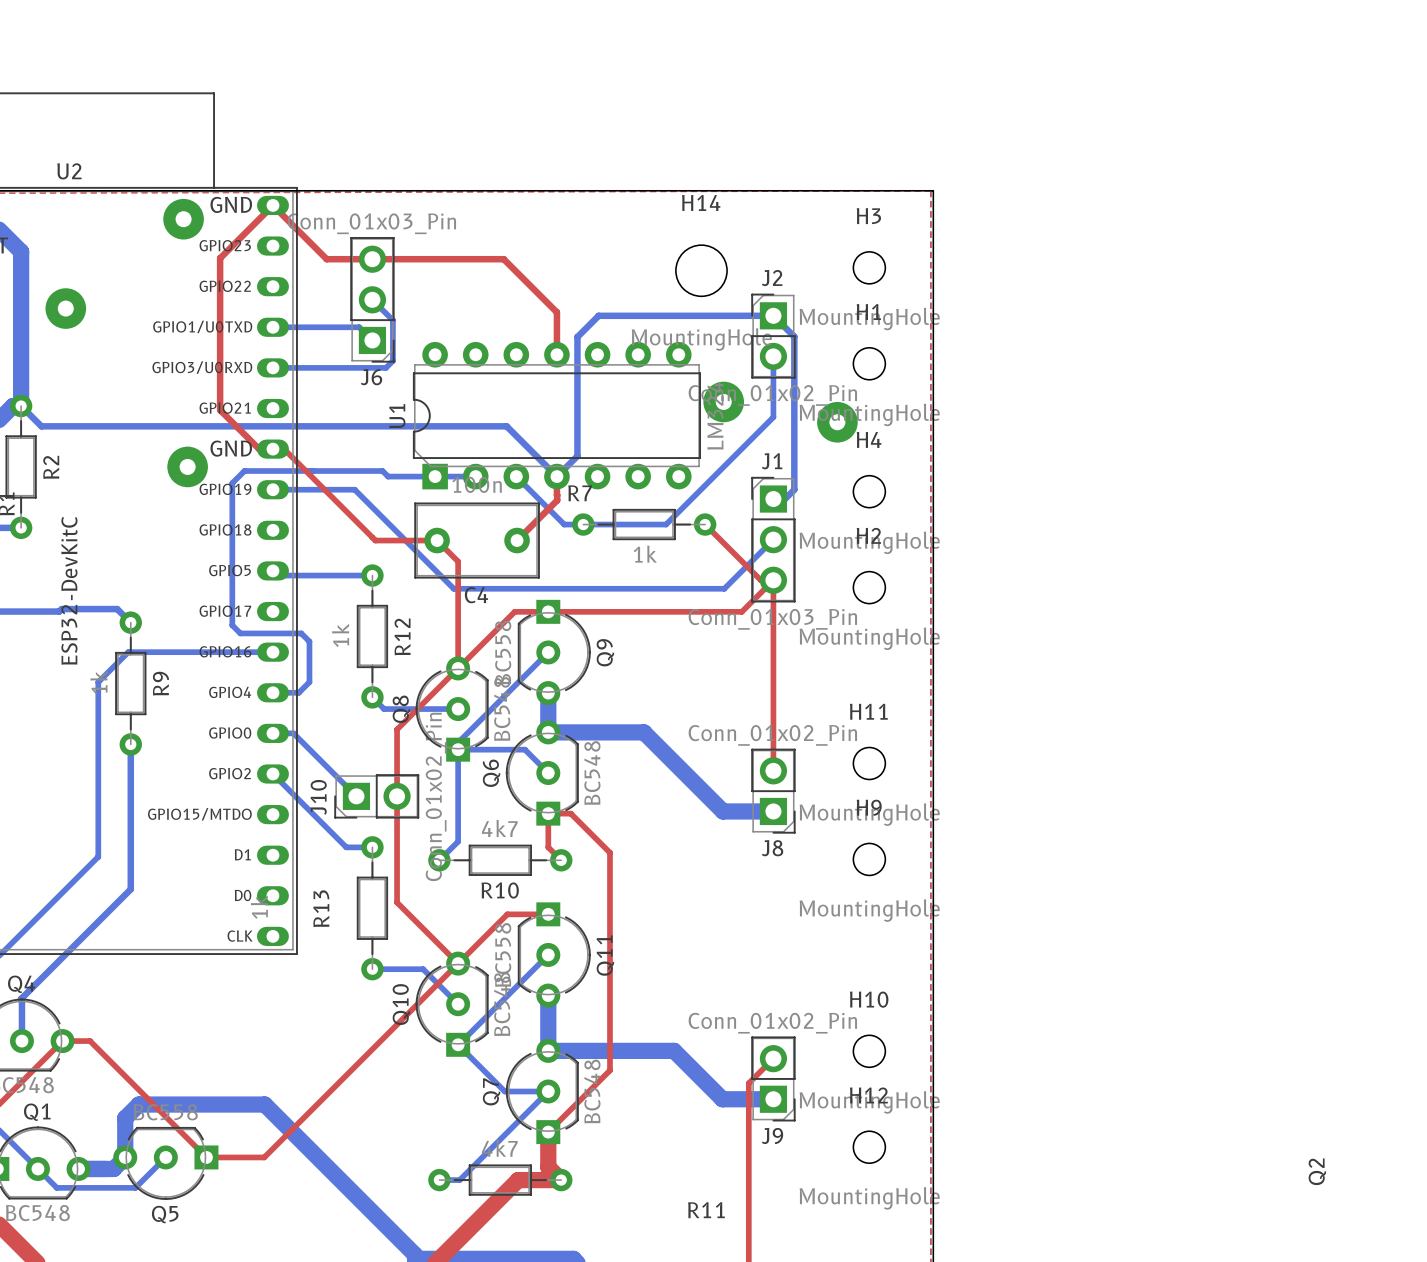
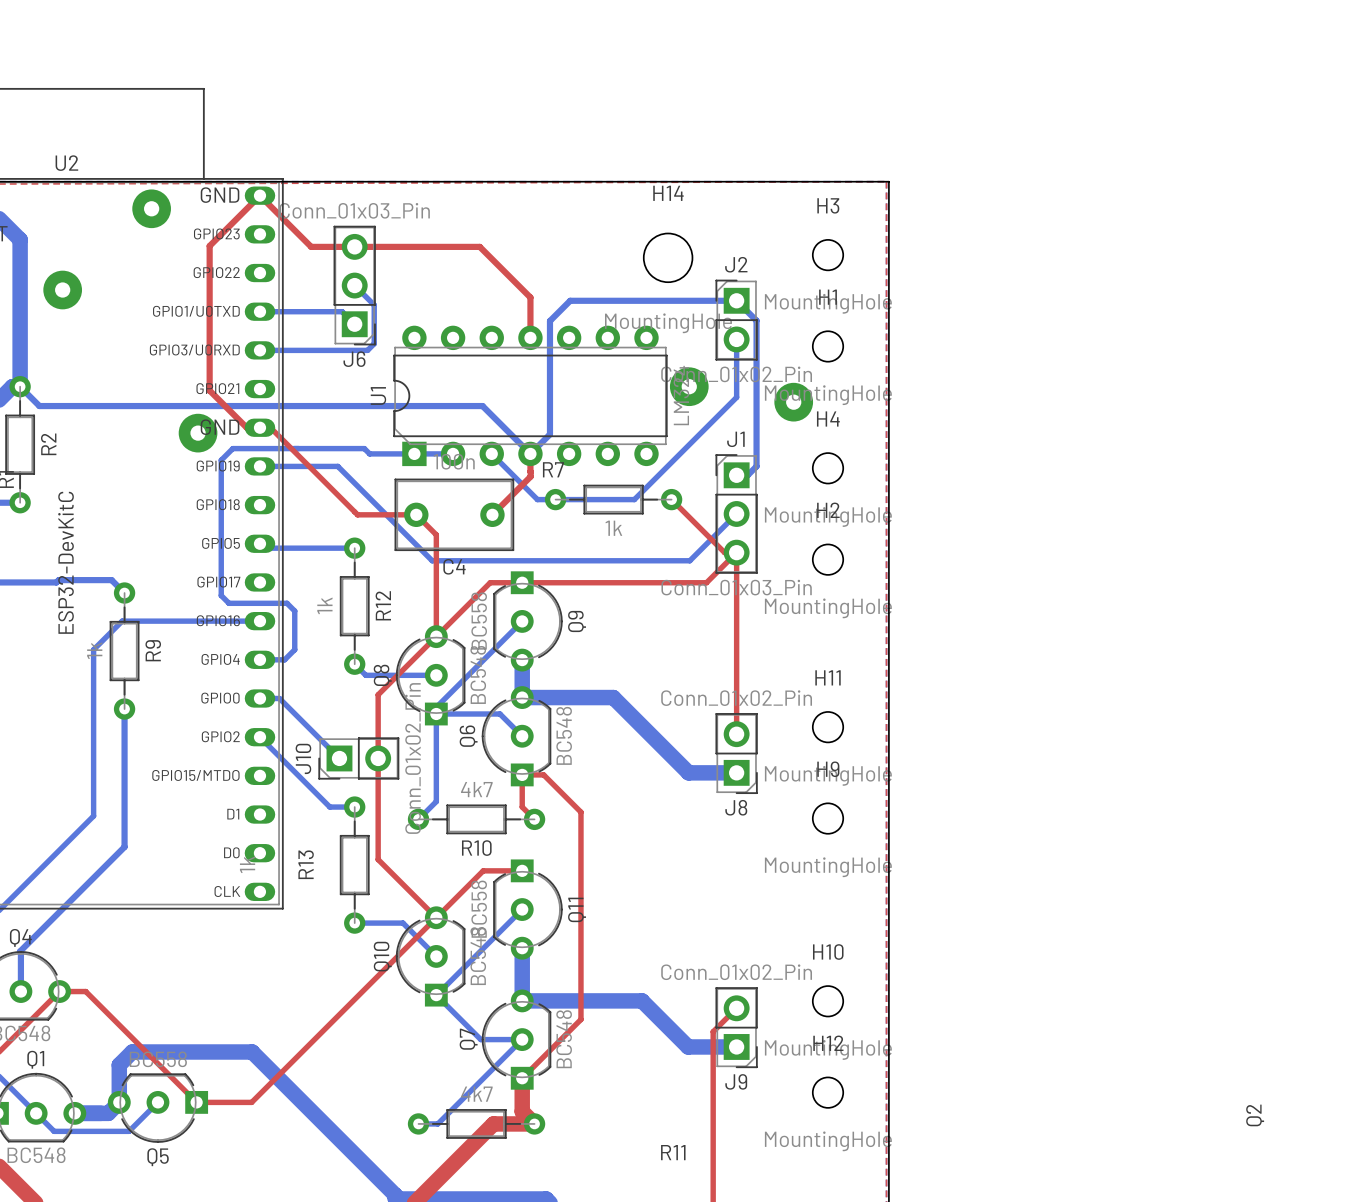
via: none -> (151, 208)
part: (183, 219) -> none
via: none -> (62, 290)
part: (65, 308) -> none
part: (723, 401) -> none
via: none -> (689, 386)
via: none -> (793, 402)
part: (837, 422) -> none
via: none -> (198, 433)
part: (187, 466) -> none

